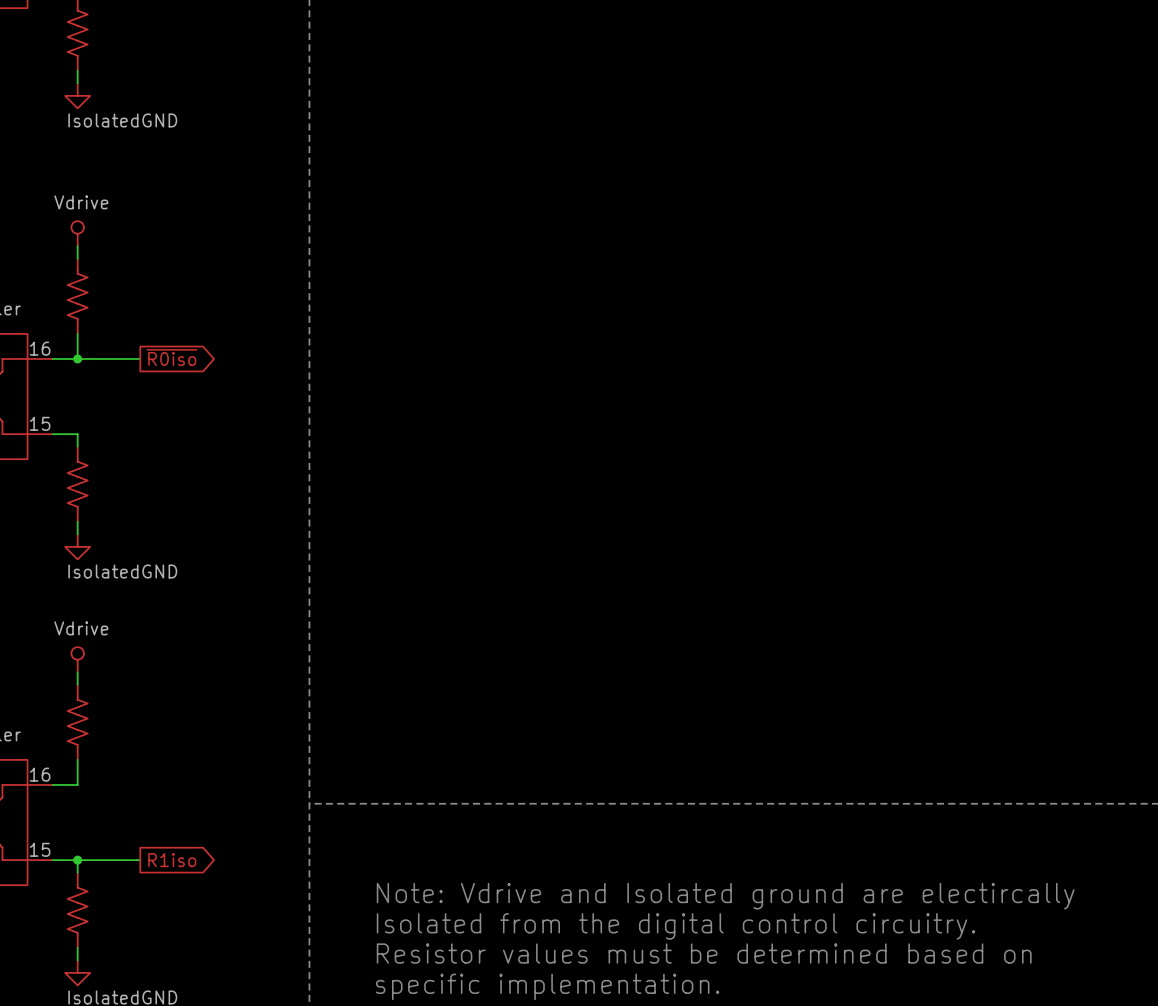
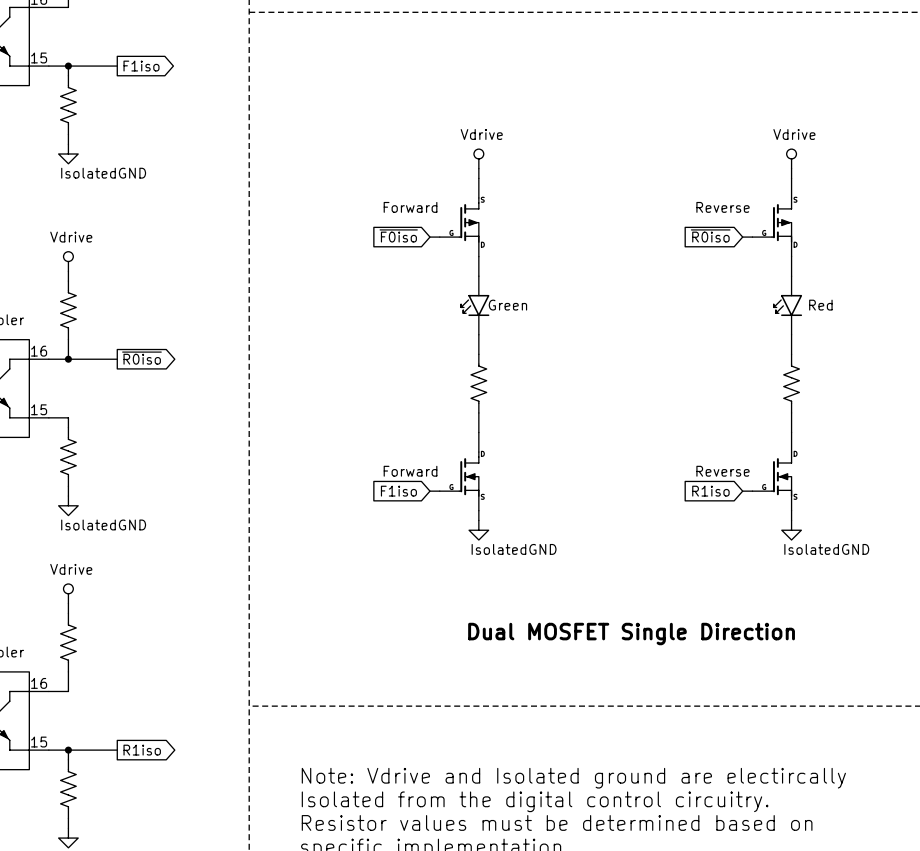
power symbol: none -> Vdrive (478, 158)
power symbol: none -> Vdrive (791, 158)
wire: none -> (478, 168) (478, 178)
wire: none -> (791, 168) (791, 178)
part: none -> Forward (459, 217)
part: none -> Reverse (772, 217)
global label: none -> ~{F0iso} (398, 235)
global label: none -> ~{R0iso} (710, 235)
wire: none -> (429, 237) (439, 237)
wire: none -> (742, 237) (752, 237)
wire: none -> (478, 256) (478, 276)
wire: none -> (791, 256) (791, 276)
part: none -> Green (475, 305)
part: none -> Red (787, 305)
wire: none -> (478, 334) (478, 354)
wire: none -> (791, 334) (791, 354)
part: none -> (478, 383)
part: none -> (791, 383)
wire: none -> (478, 412) (478, 432)
wire: none -> (791, 412) (791, 432)
part: none -> Forward (459, 471)
part: none -> Reverse (772, 471)
global label: none -> F1iso (398, 491)
wire: none -> (429, 491) (439, 491)
global label: none -> R1iso (710, 491)
wire: none -> (742, 491) (752, 491)
wire: none -> (478, 510) (478, 520)
wire: none -> (791, 510) (791, 520)
IsolatedGND: none -> (478, 530)
IsolatedGND: none -> (791, 530)
text: none -> Dual MOSFET Single Direction (631, 634)

